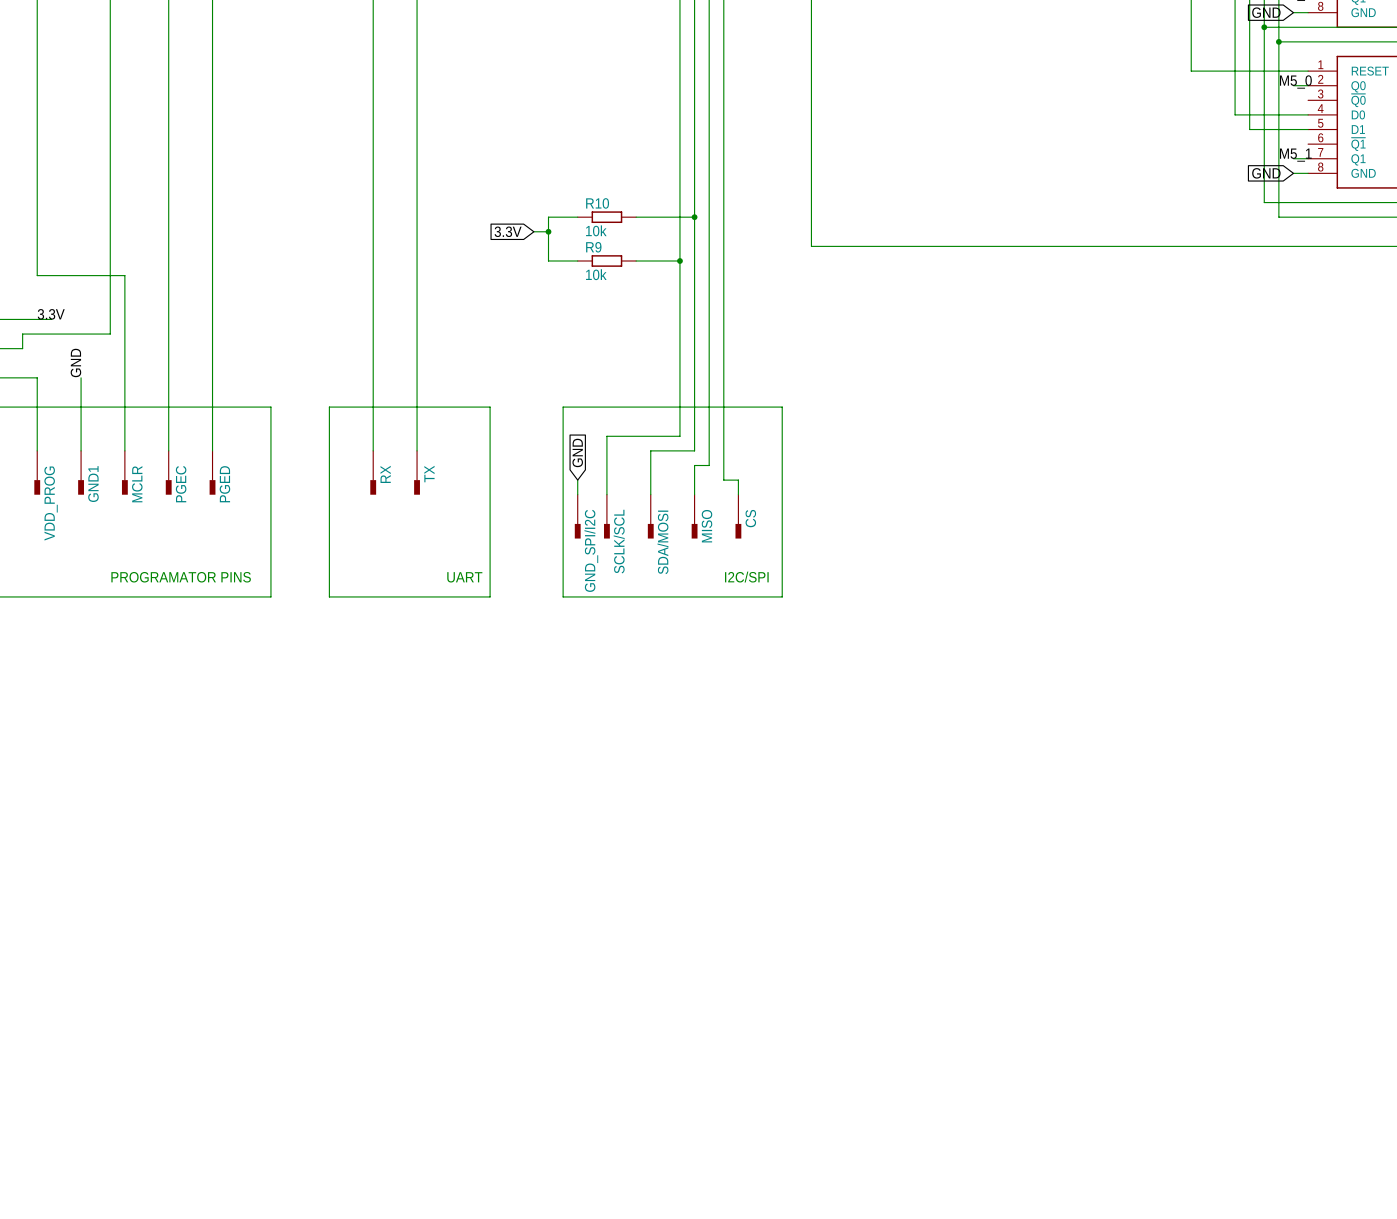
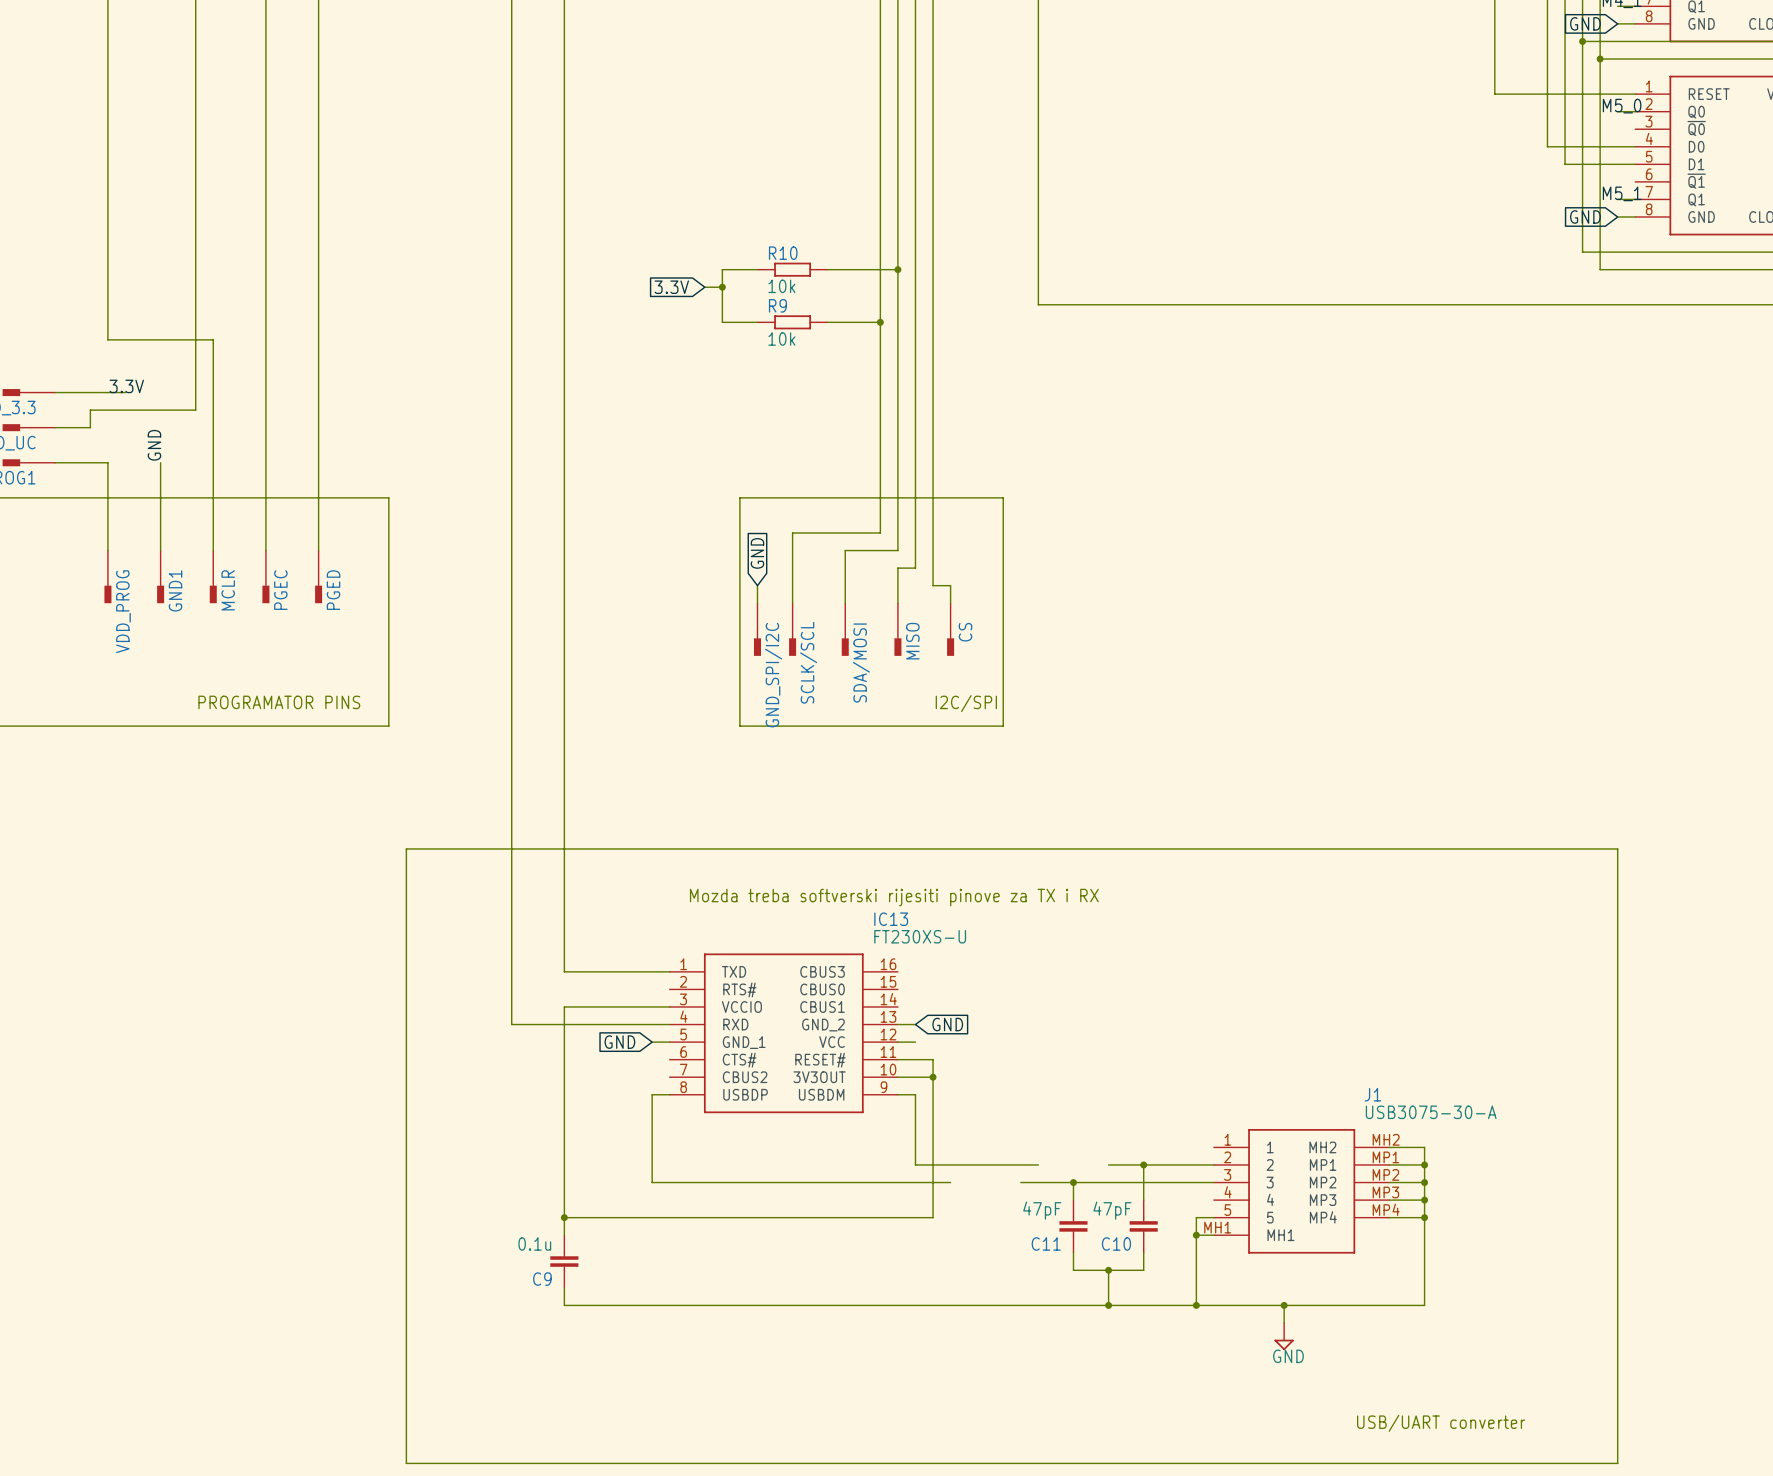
wire: (329, 407) (329, 596) (490, 596) (490, 407) (329, 407) -> none
wire: none -> (511, 550) (511, 1024) (669, 1024)
wire: none -> (564, 550) (564, 971) (669, 971)
RX: (373, 472) -> none
TX: (417, 472) -> none
text: UART (464, 577) -> none
wire: none -> (406, 848) (1617, 848) (1617, 1463) (406, 1463) (406, 848)
text: none -> Mozda treba softverski rijesiti pinove za TX i RX (894, 897)
wire: none -> (669, 1006) (564, 1006) (564, 1235)
wire: none -> (897, 1024) (915, 1024)
global label: none -> GND (947, 1024)
IC13: none -> FT230XS-U (783, 1033)
global label: none -> GND (619, 1042)
wire: none -> (652, 1042) (669, 1042)
wire: none -> (897, 1042) (915, 1042)
wire: none -> (897, 1059) (933, 1059) (933, 1217) (564, 1217)
wire: none -> (897, 1077) (933, 1077)
junction: none -> (933, 1077)
wire: none -> (669, 1094) (652, 1094) (652, 1182) (950, 1182)
wire: none -> (897, 1094) (915, 1094) (915, 1164) (1038, 1164)
wire: none -> (1389, 1147) (1424, 1147) (1424, 1305) (564, 1305) (564, 1287)
wire: none -> (1108, 1164) (1213, 1164)
wire: none -> (1143, 1164) (1143, 1200)
junction: none -> (1143, 1164)
wire: none -> (1389, 1164) (1424, 1164)
junction: none -> (1424, 1164)
wire: none -> (1020, 1182) (1213, 1182)
wire: none -> (1073, 1182) (1073, 1200)
junction: none -> (1073, 1182)
wire: none -> (1389, 1182) (1424, 1182)
junction: none -> (1424, 1182)
J1: none -> USB3075-30-A (1301, 1191)
wire: none -> (1389, 1200) (1424, 1200)
junction: none -> (1424, 1200)
junction: none -> (564, 1217)
wire: none -> (1213, 1217) (1196, 1217) (1196, 1305)
wire: none -> (1389, 1217) (1424, 1217)
junction: none -> (1424, 1217)
C11: none -> 47pF (1073, 1226)
C10: none -> 47pF (1143, 1226)
wire: none -> (1196, 1235) (1213, 1235)
junction: none -> (1196, 1235)
wire: none -> (1073, 1252) (1073, 1270) (1143, 1270) (1143, 1252)
C9: none -> 0.1u (564, 1261)
wire: none -> (1108, 1270) (1108, 1305)
junction: none -> (1108, 1270)
junction: none -> (1108, 1305)
junction: none -> (1196, 1305)
wire: none -> (1284, 1305) (1284, 1322)
junction: none -> (1284, 1305)
power symbol: none -> GND (1284, 1336)
text: none -> USB/UART converter (1441, 1423)

